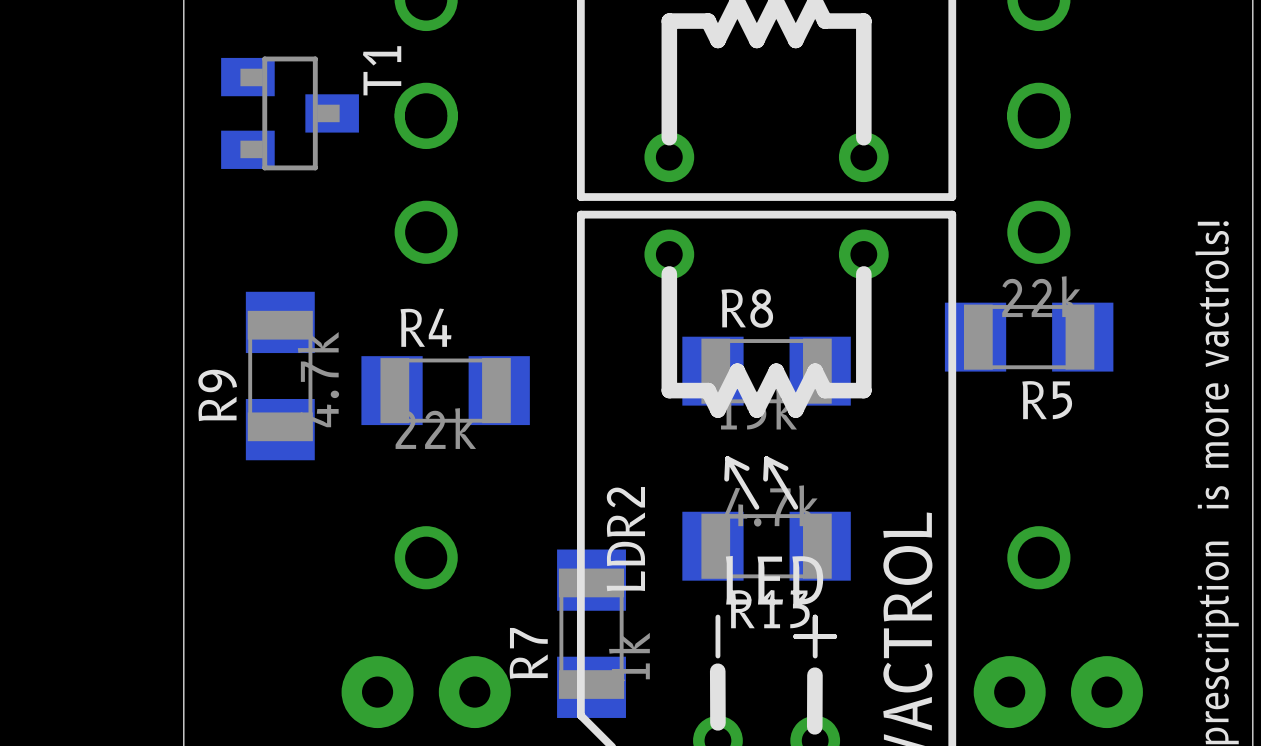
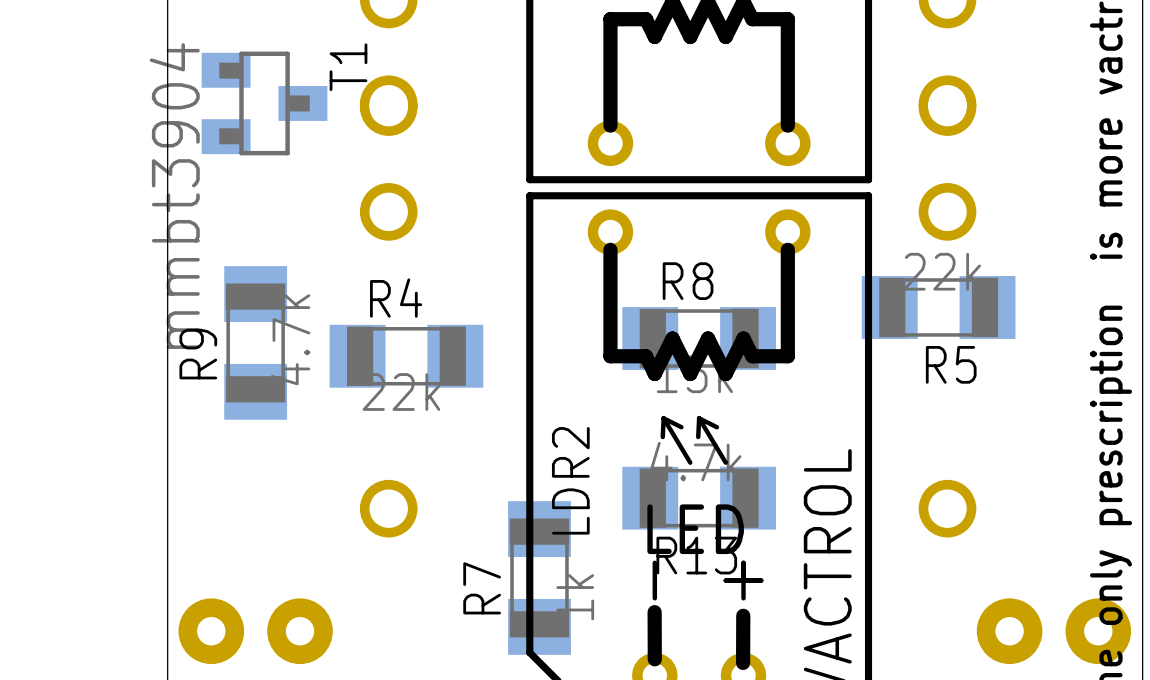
T1 value: none -> mmbt3904 (174, 196)
part position: (426, 692) -> (255, 631)
part position: (1058, 692) -> (1053, 631)

